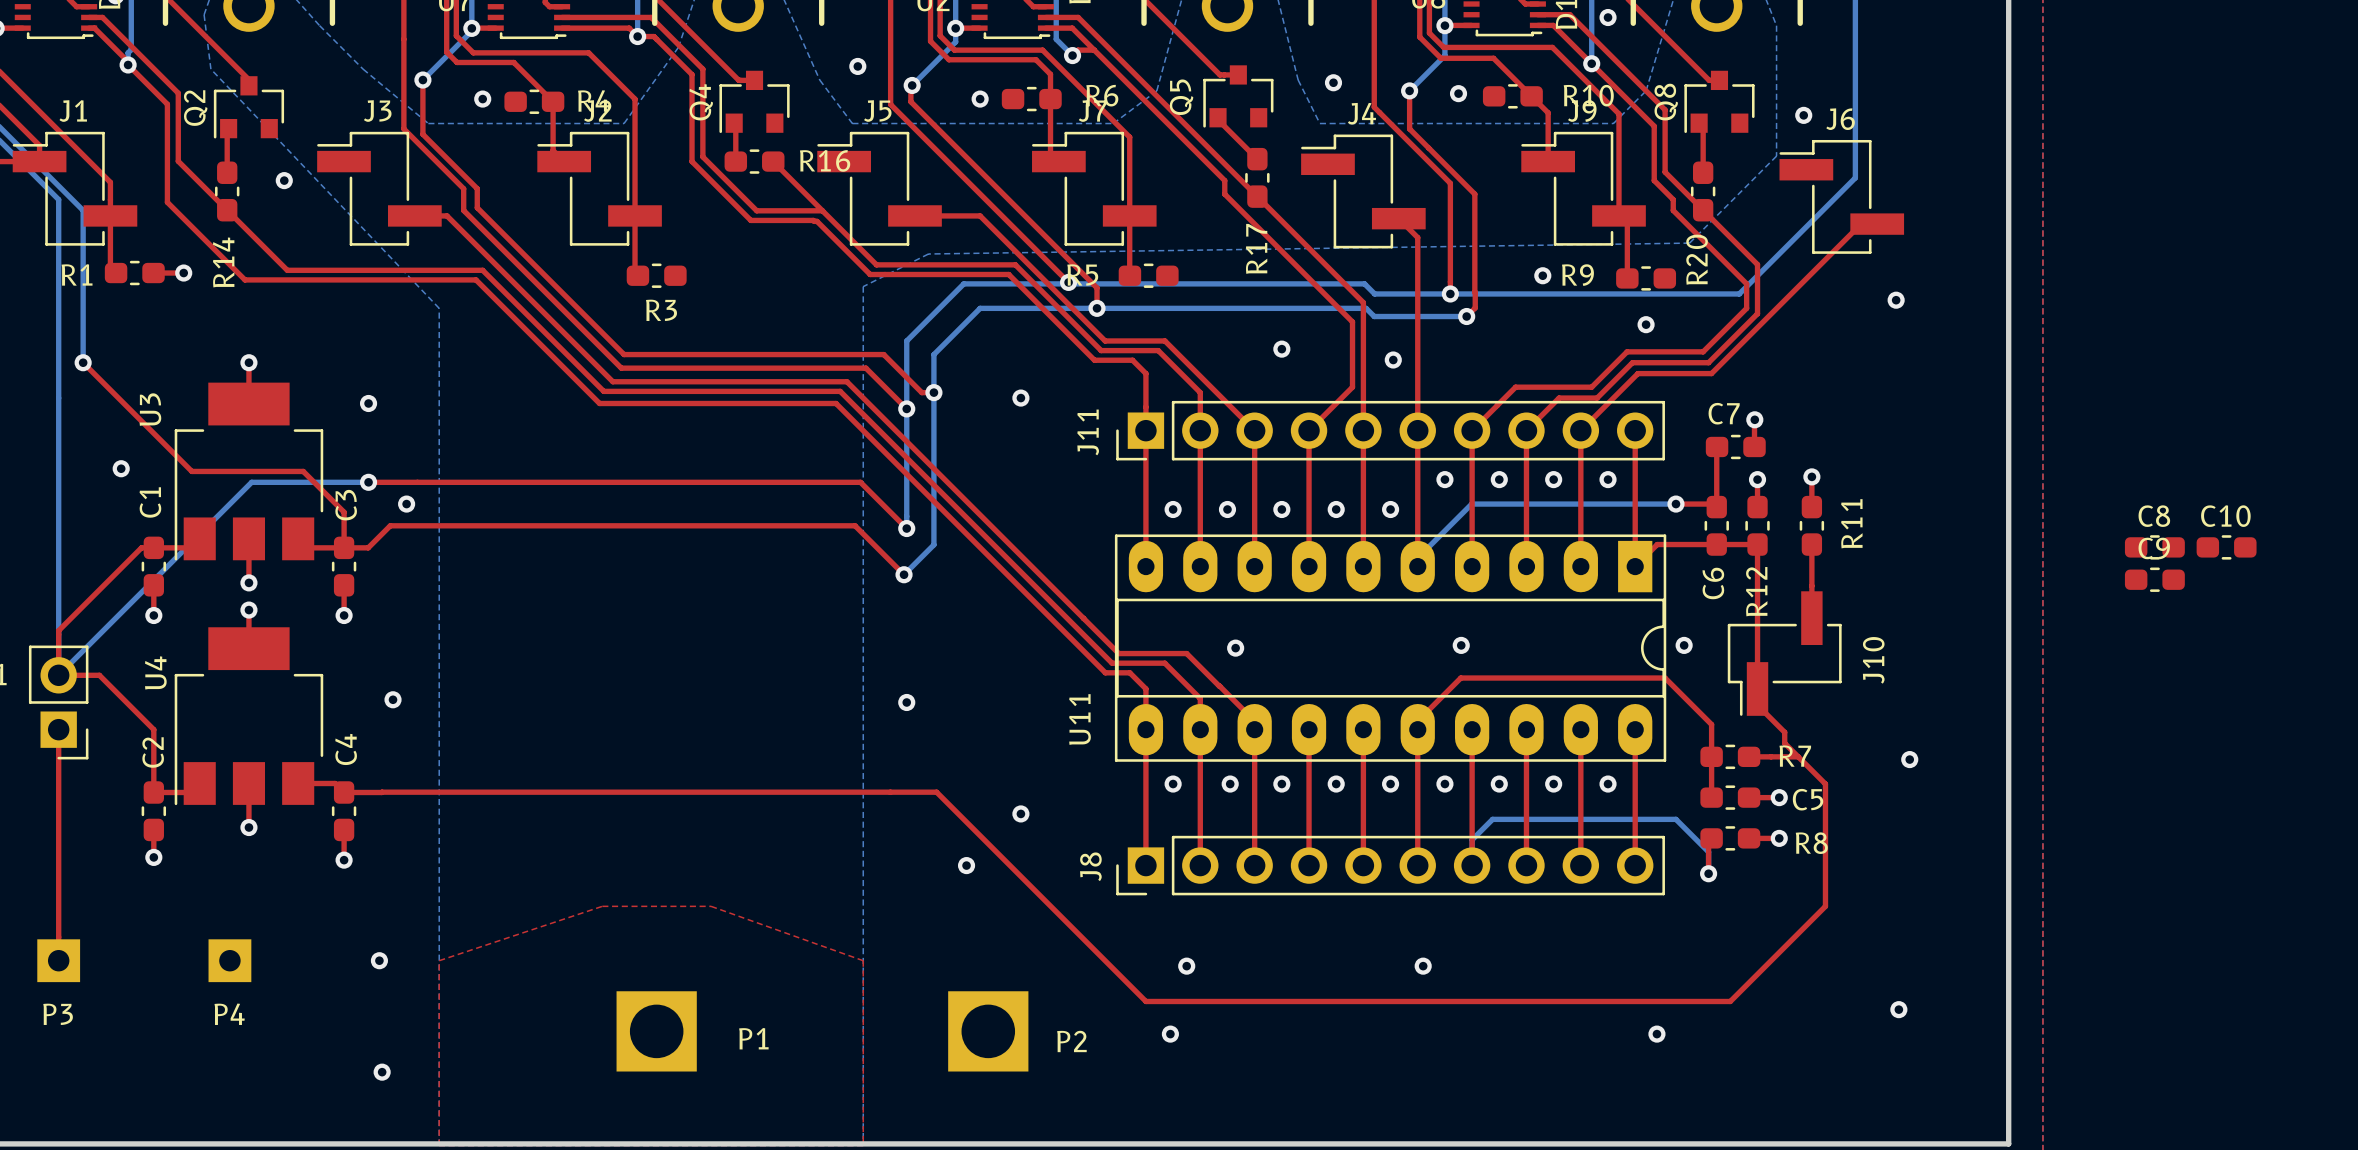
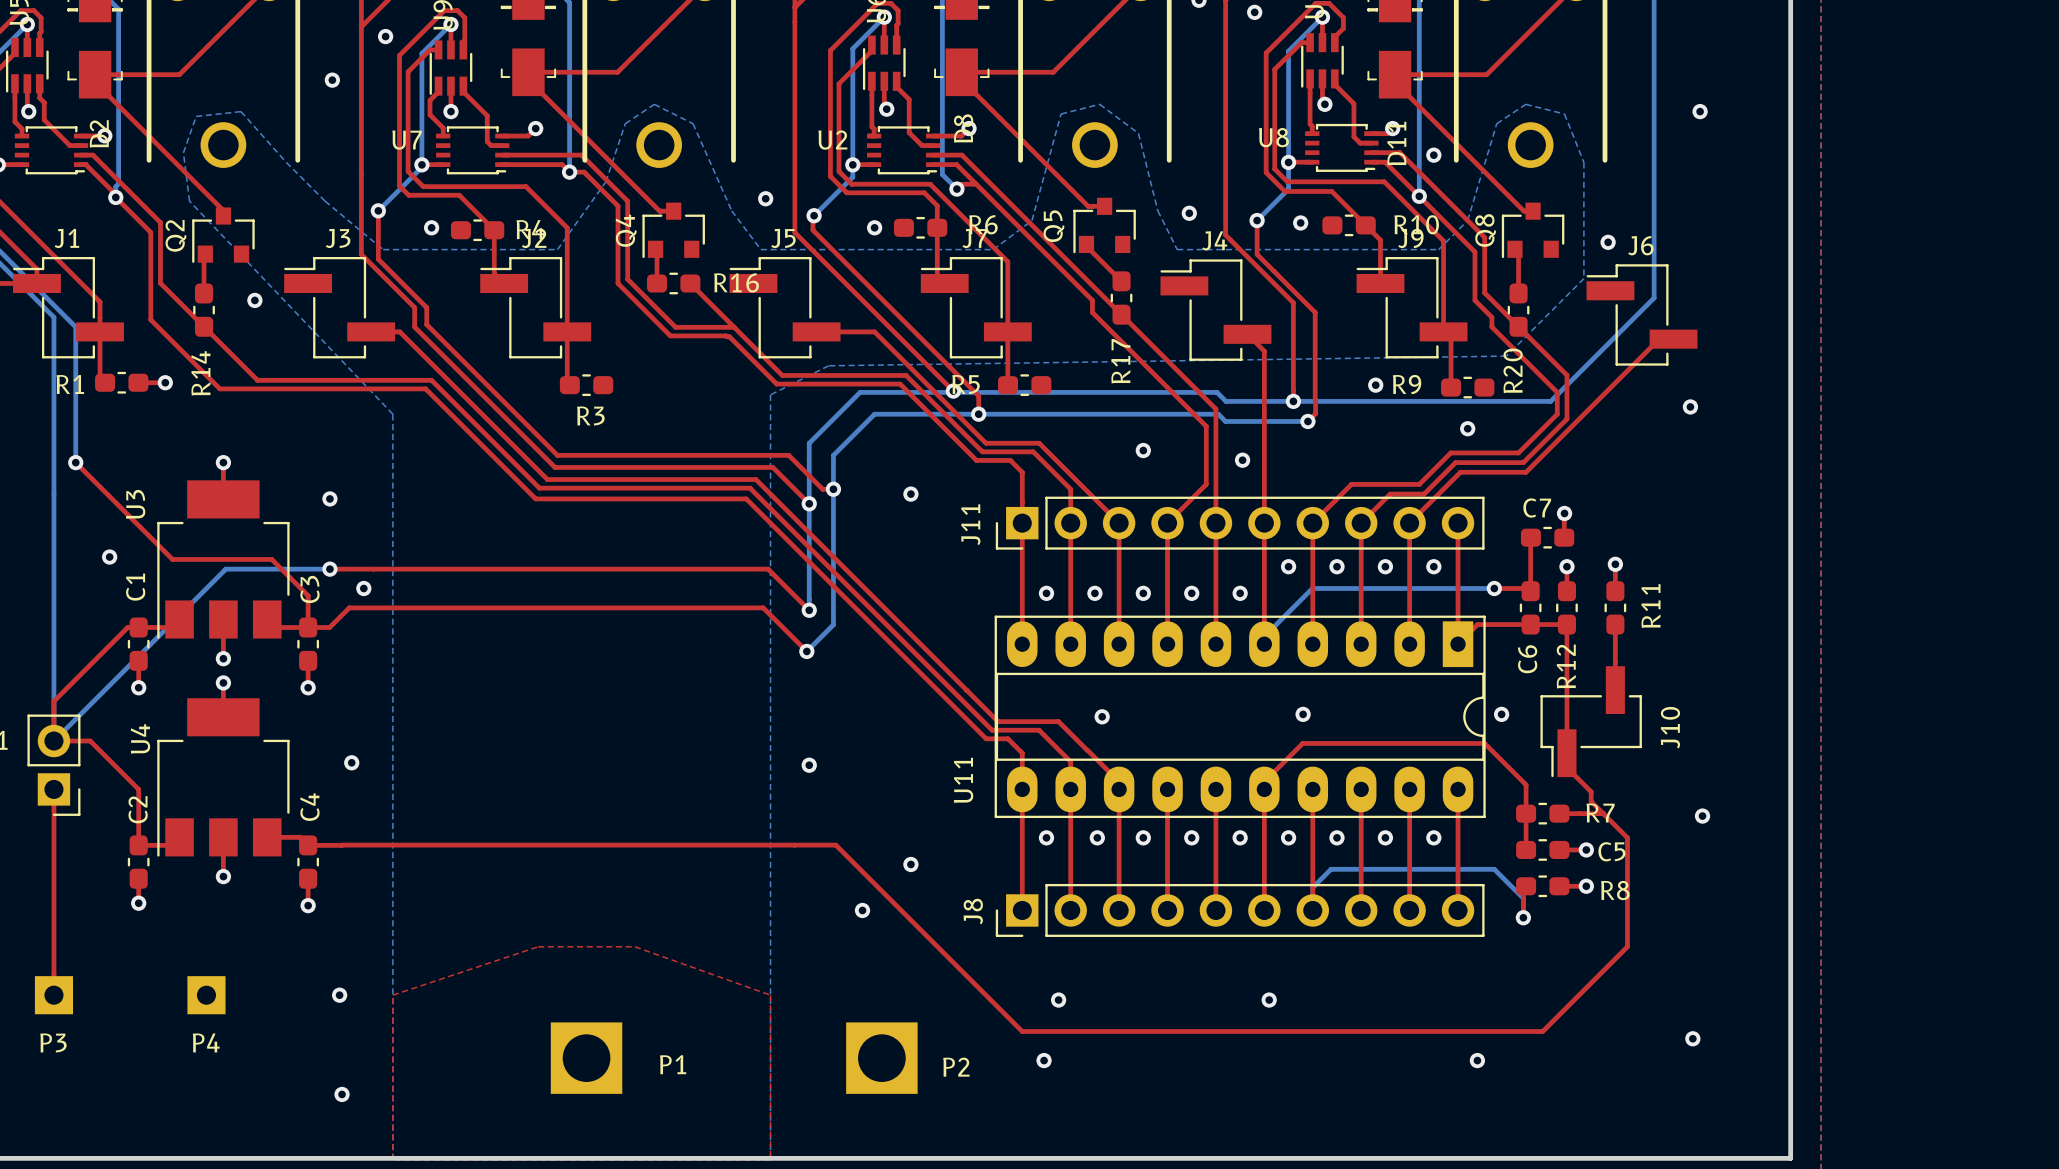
C8: (2154, 547) -> none
C10: (2226, 547) -> none
C9: (2154, 579) -> none

